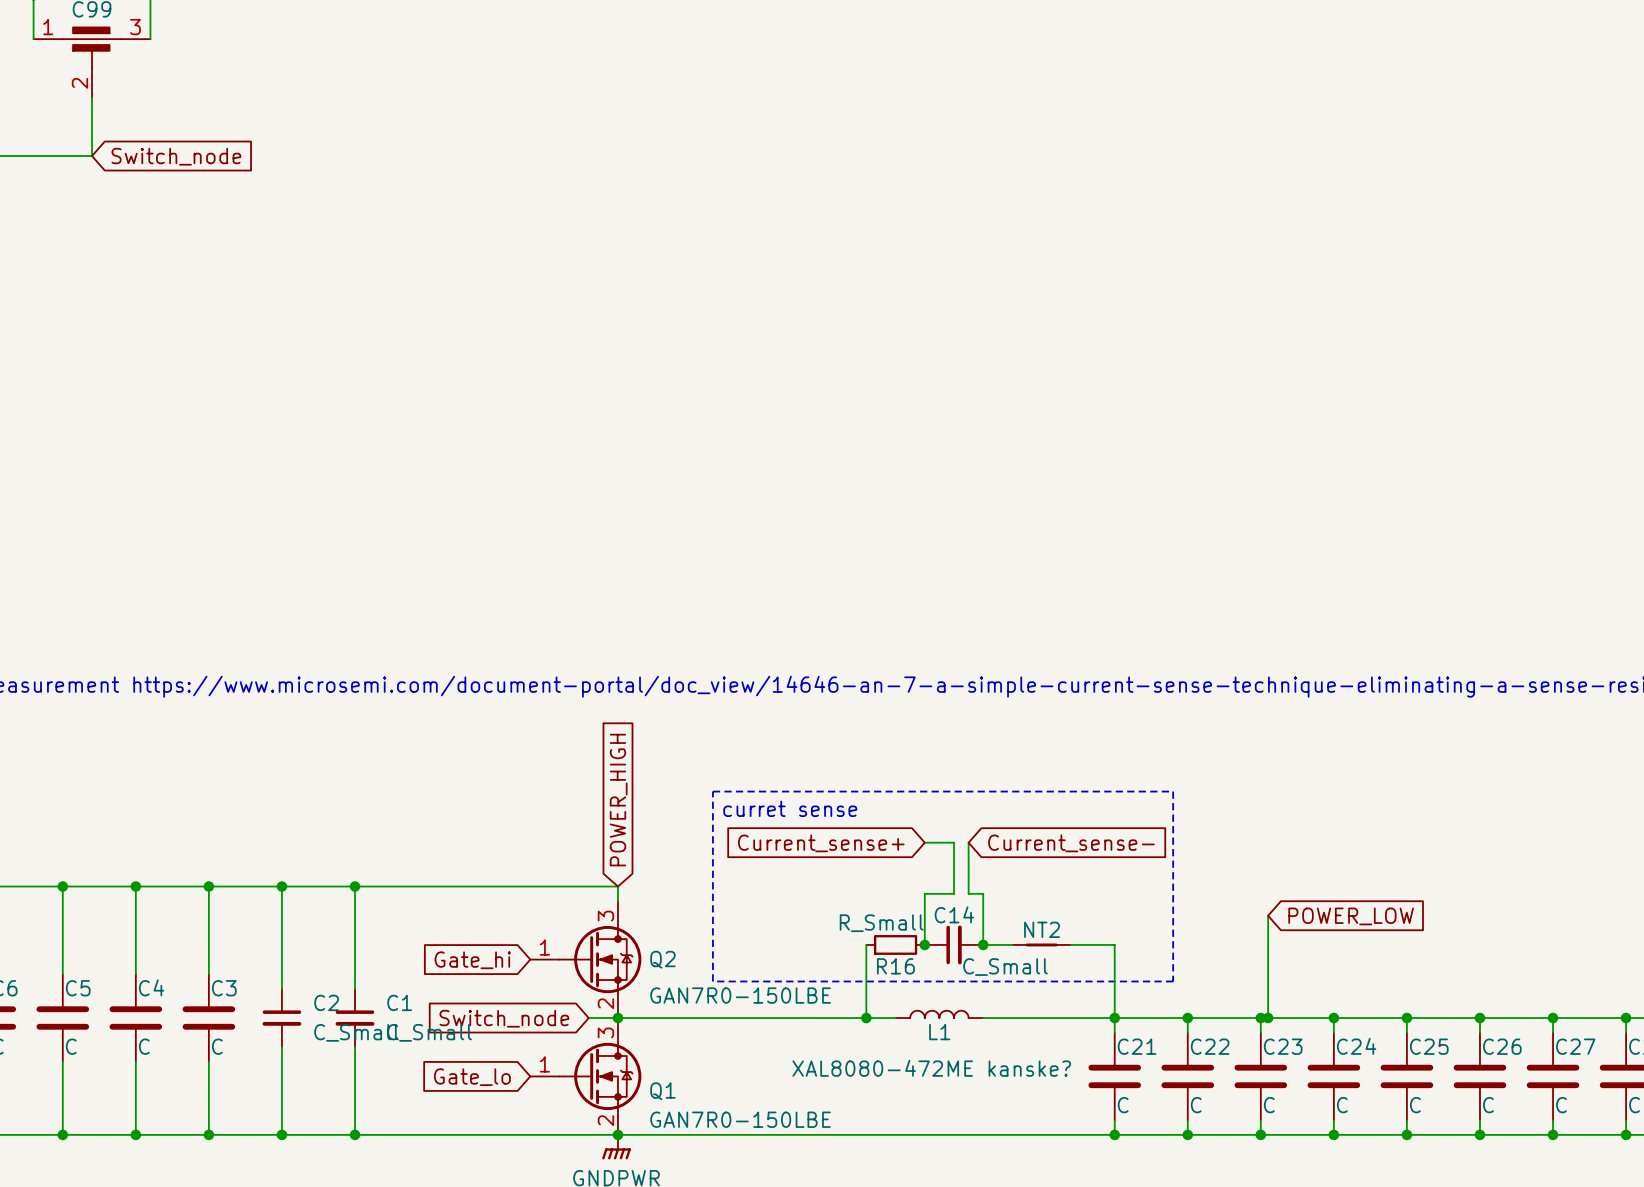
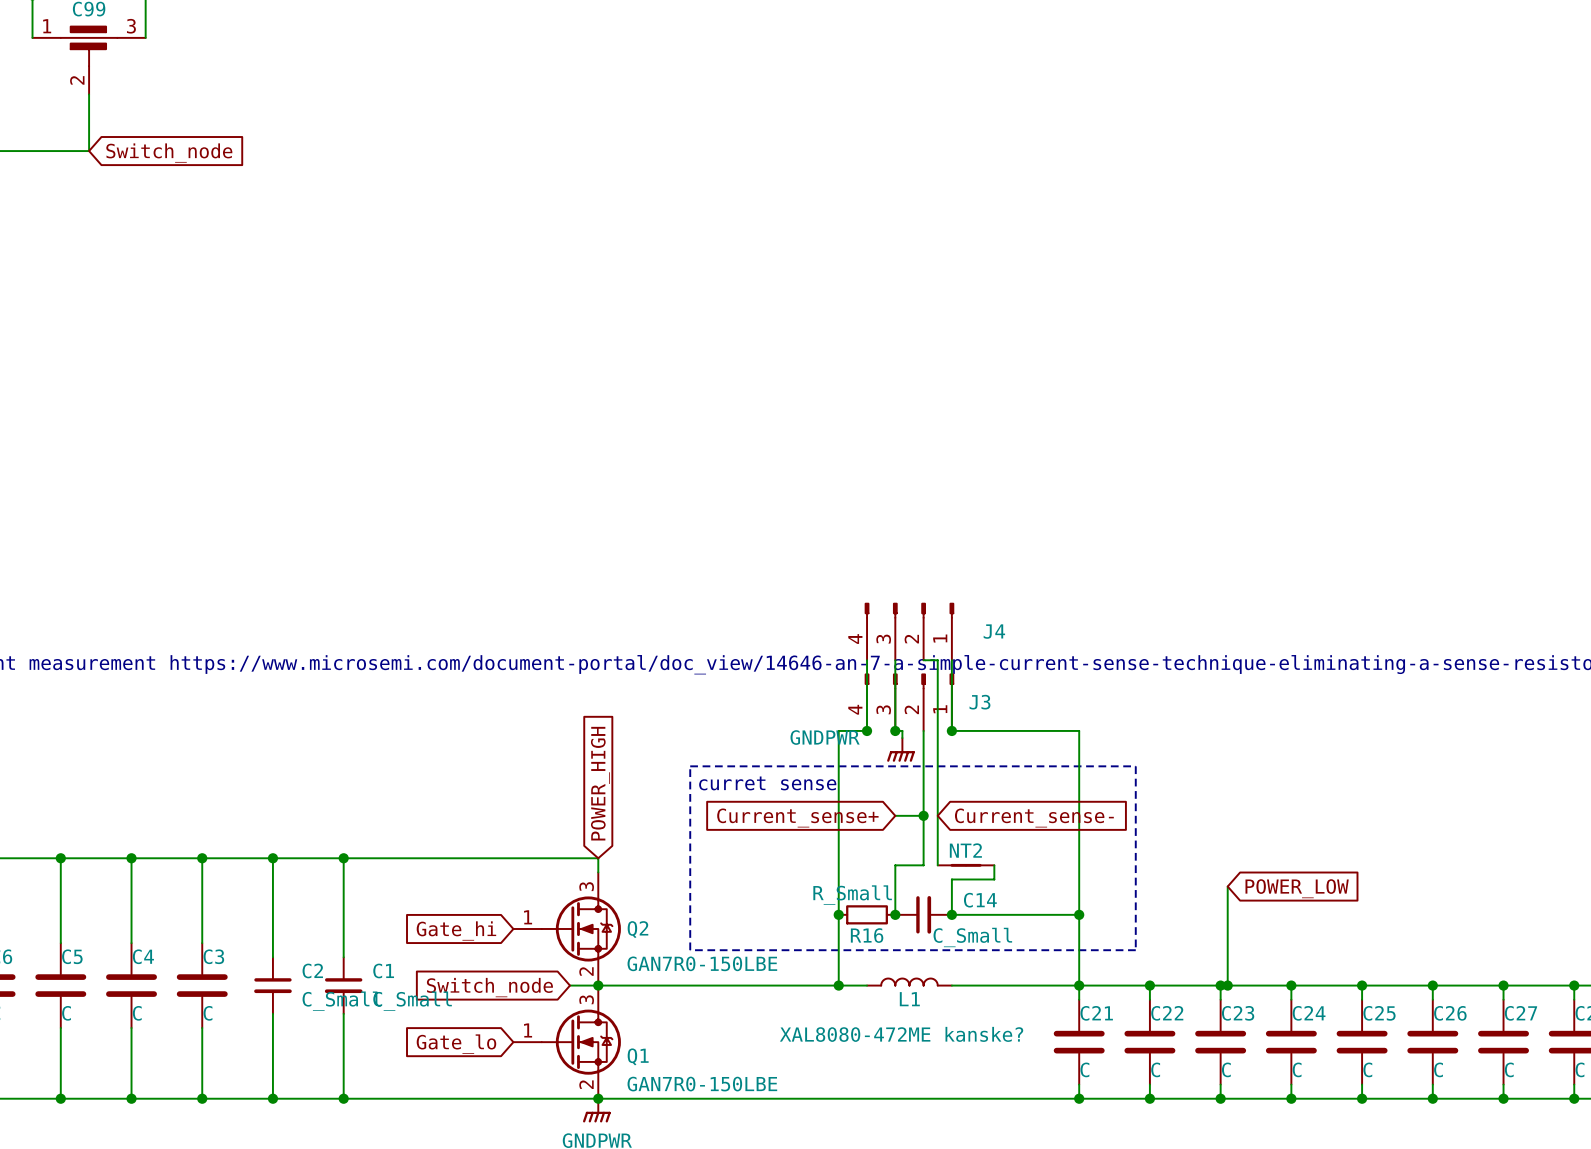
J4: none -> (909, 631)
wire: none -> (867, 660) (867, 730) (838, 730) (838, 914)
wire: none -> (895, 660) (895, 730) (902, 730) (902, 738)
wire: none -> (923, 660) (937, 660) (937, 815)
wire: none -> (951, 660) (951, 730) (1079, 730) (1079, 914)
J3: none -> (909, 702)
junction: none -> (867, 730)
junction: none -> (895, 730)
wire: none -> (923, 730) (923, 815)
junction: none -> (951, 730)
power symbol: none -> GNDPWR (900, 749)
junction: none -> (923, 815)
wire: (968, 893) (983, 893) (983, 908) -> (994, 865) (994, 879) (951, 879)
C14 name position: C14 (954, 914) -> C14 (980, 900)
junction: none -> (838, 914)
NT2 position: (1041, 944) -> (966, 865)
junction: none -> (1079, 914)

